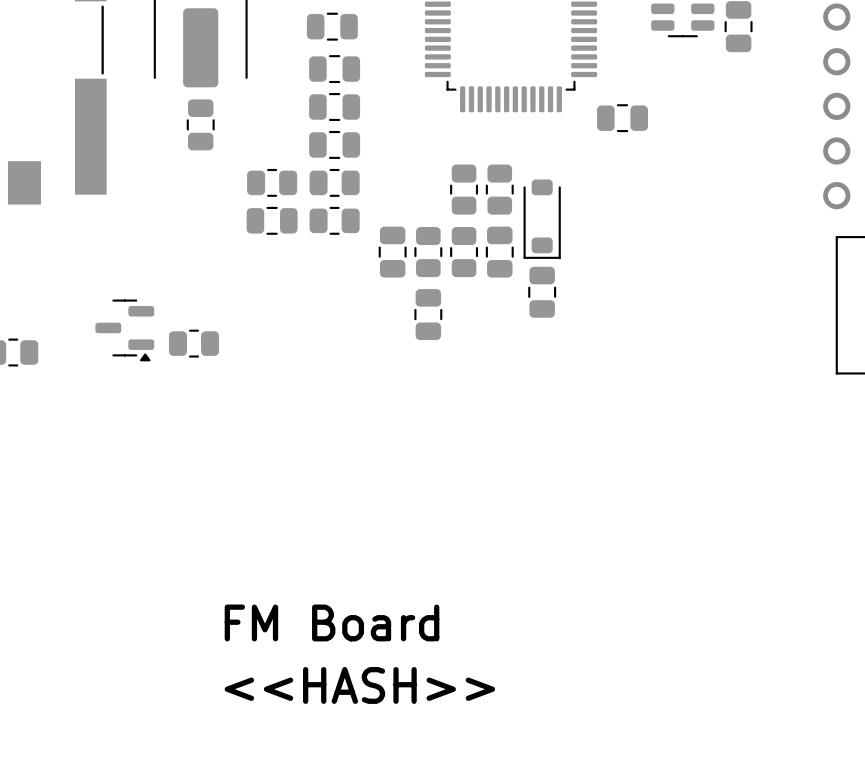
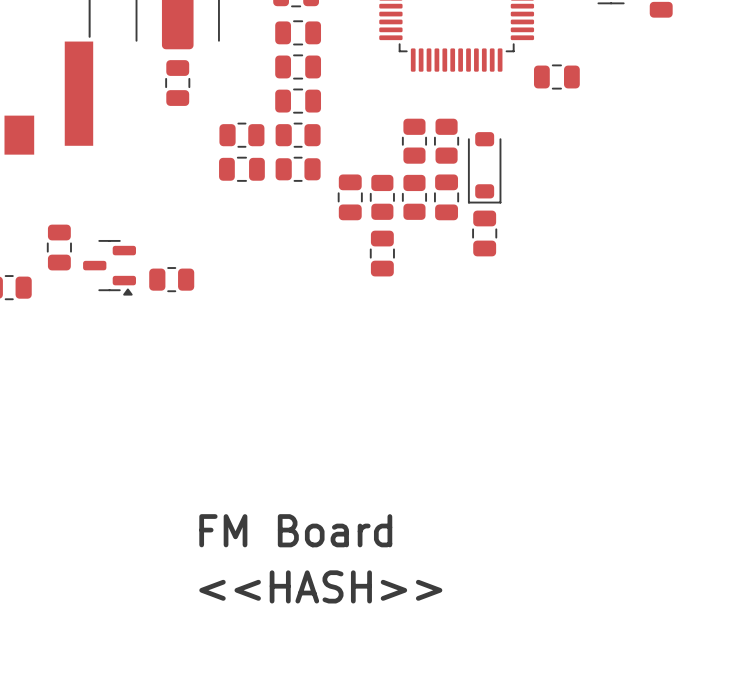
part: none -> (59, 247)

